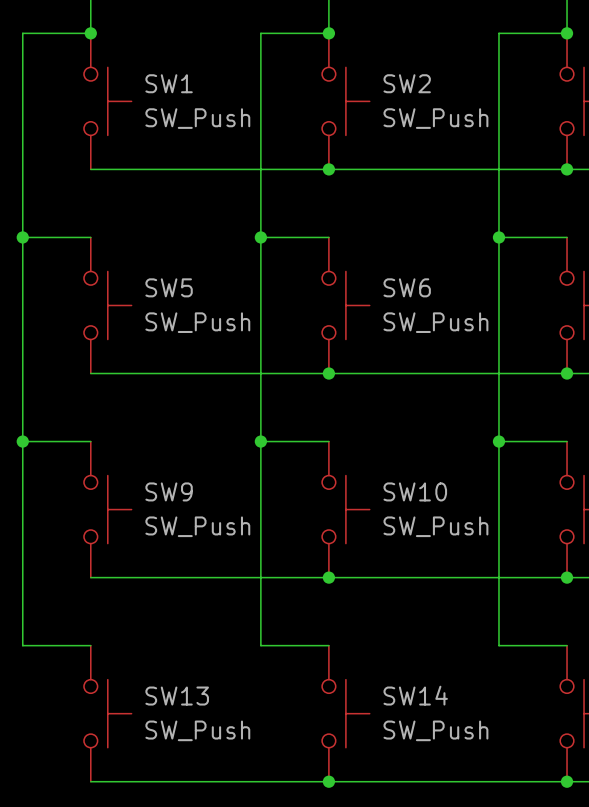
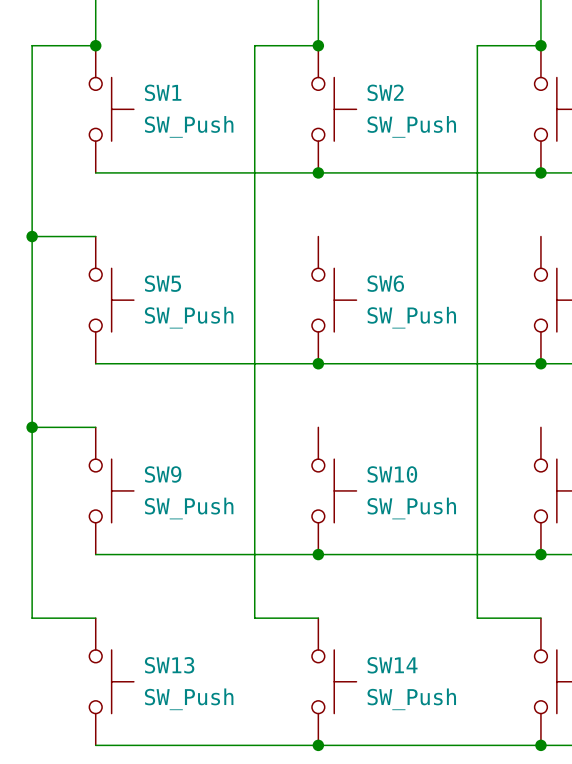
wire: (260, 237) (328, 237) -> none
junction: (260, 237) -> none
wire: (498, 237) (567, 237) -> none
junction: (498, 237) -> none
wire: (260, 441) (328, 441) -> none
junction: (260, 441) -> none
wire: (498, 441) (567, 441) -> none
junction: (498, 441) -> none

